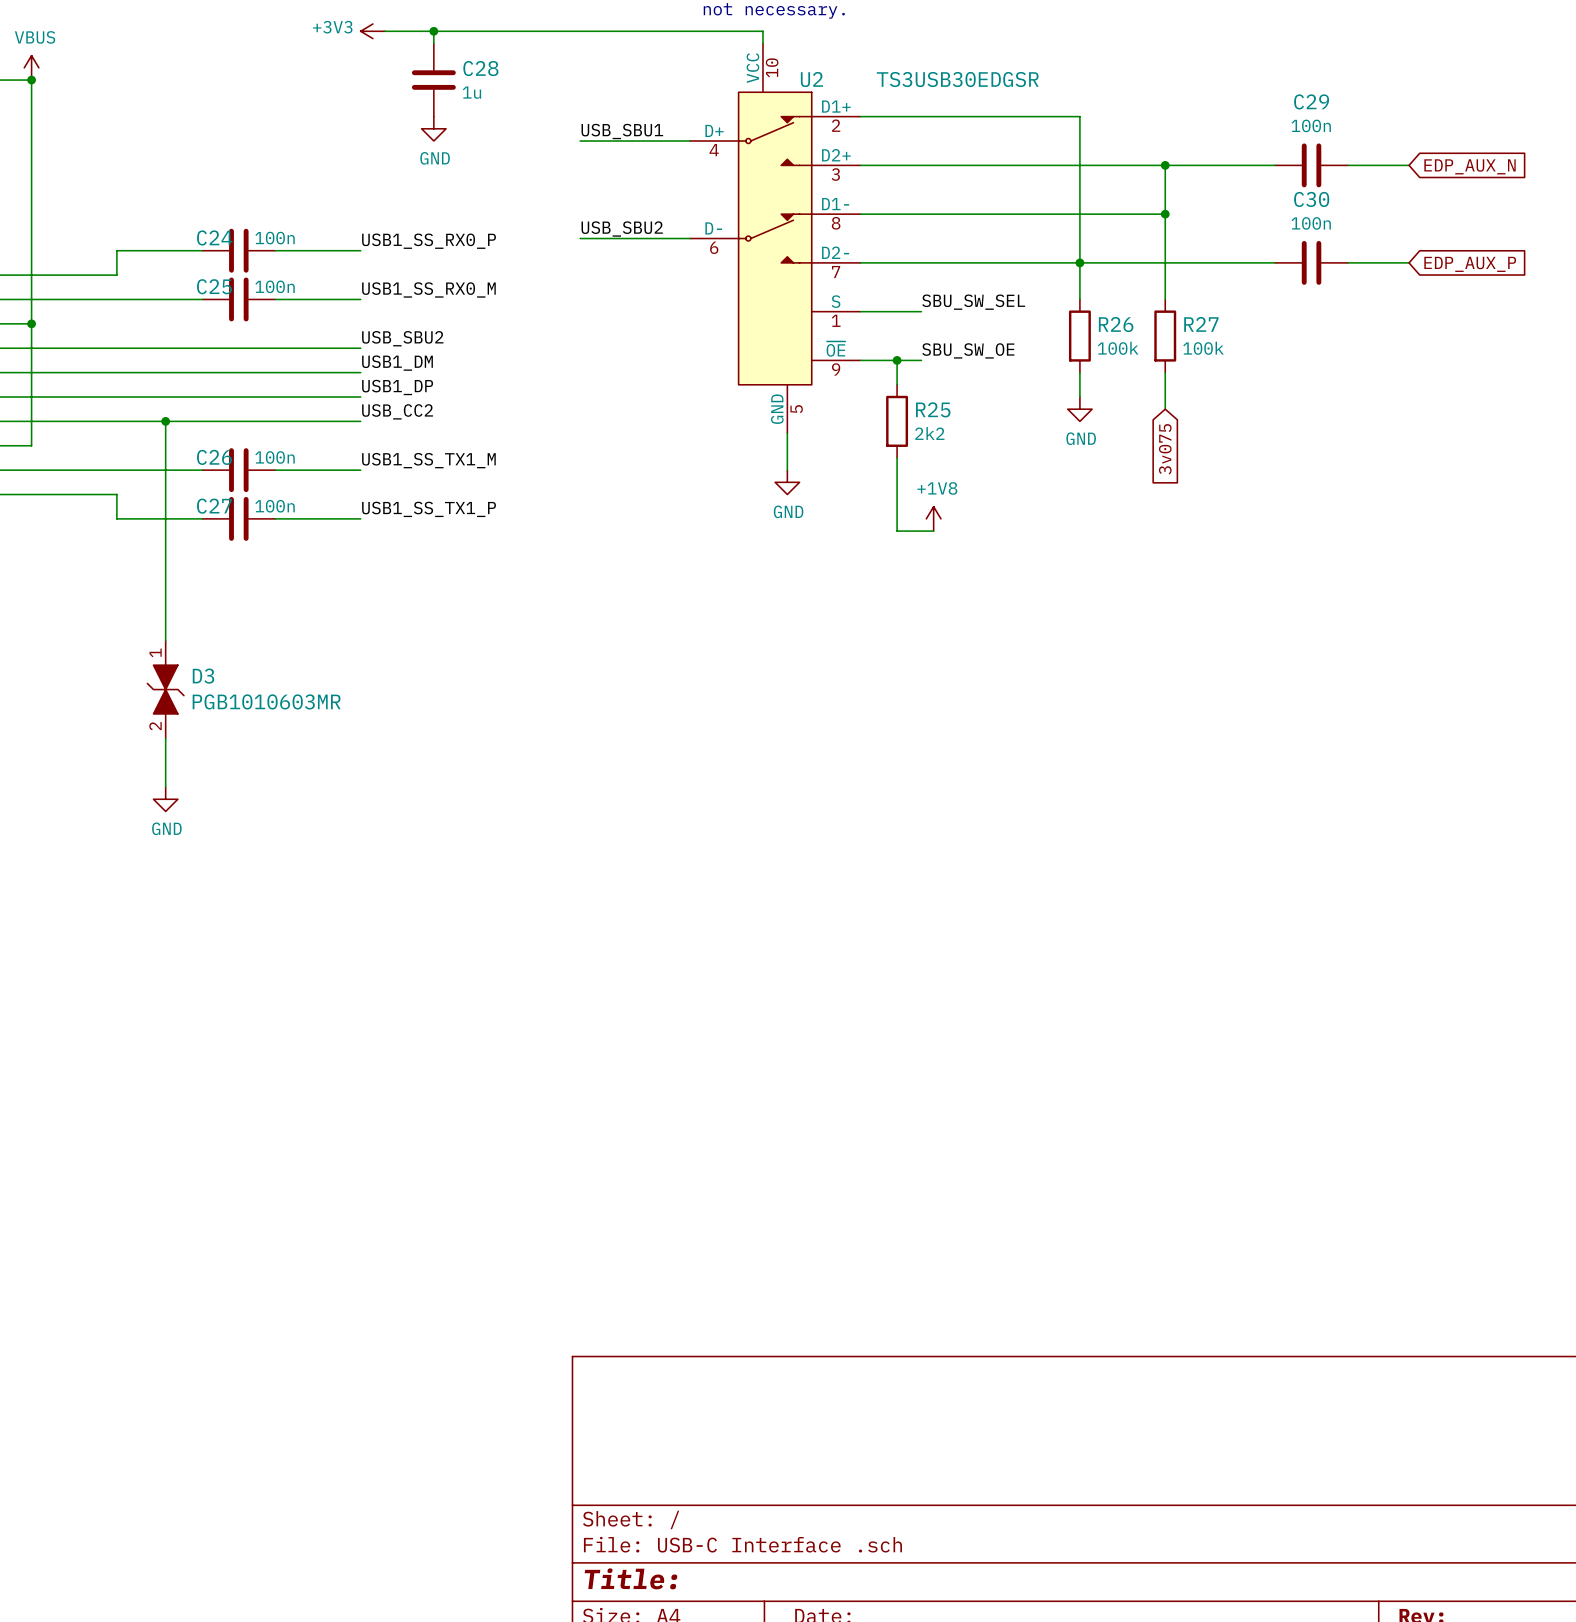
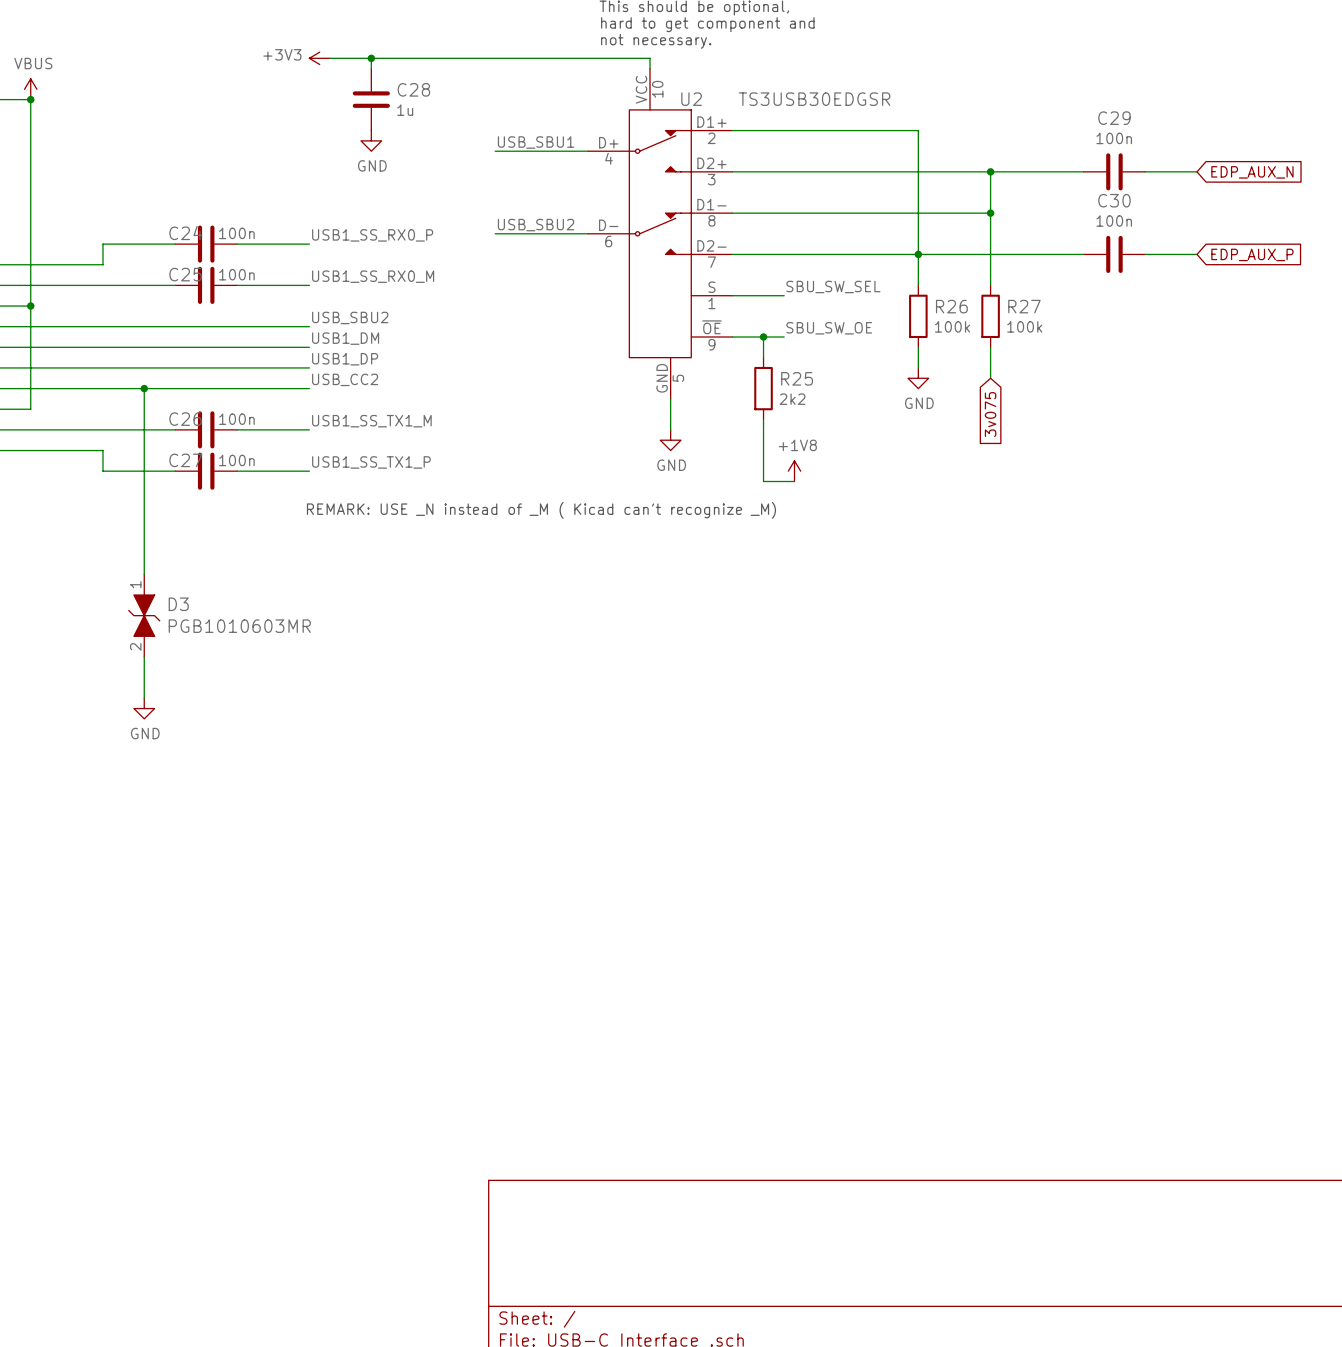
text: none -> REMARK: USE _N instead of _M ( Kicad can't recognize _M) (541, 510)

